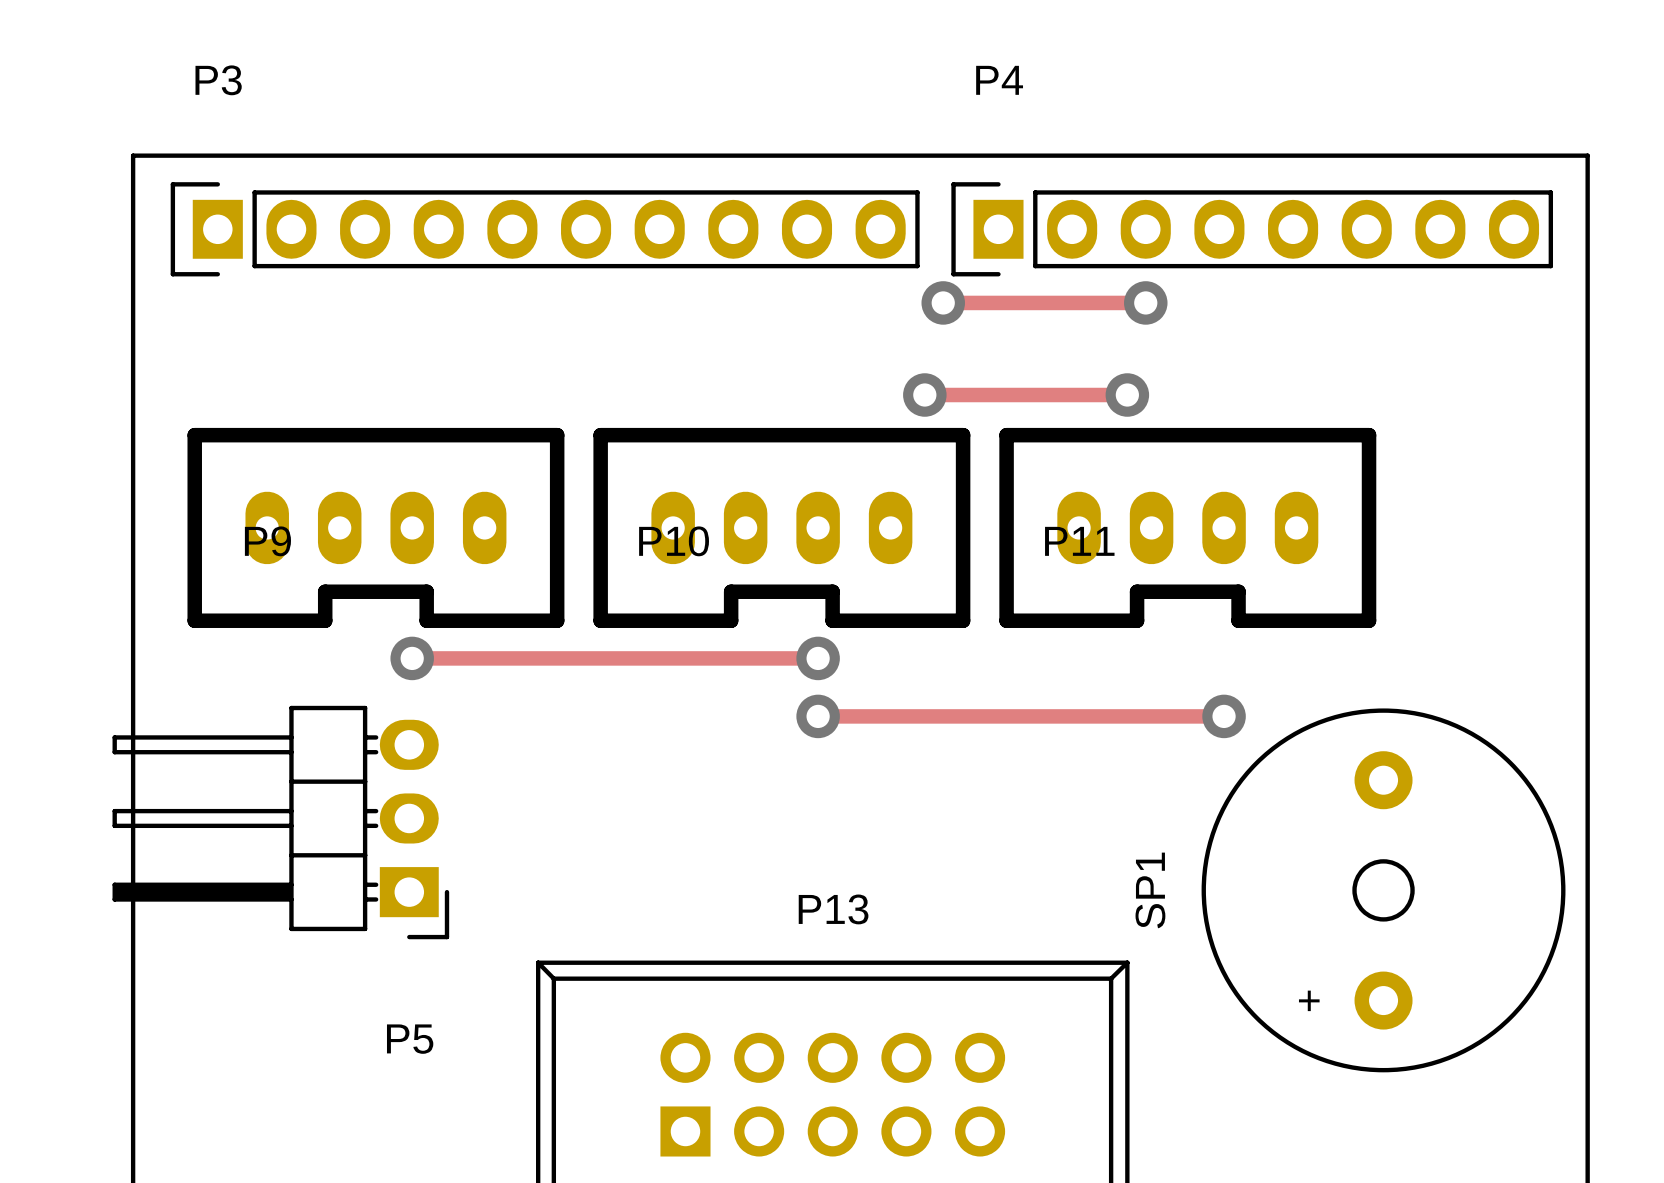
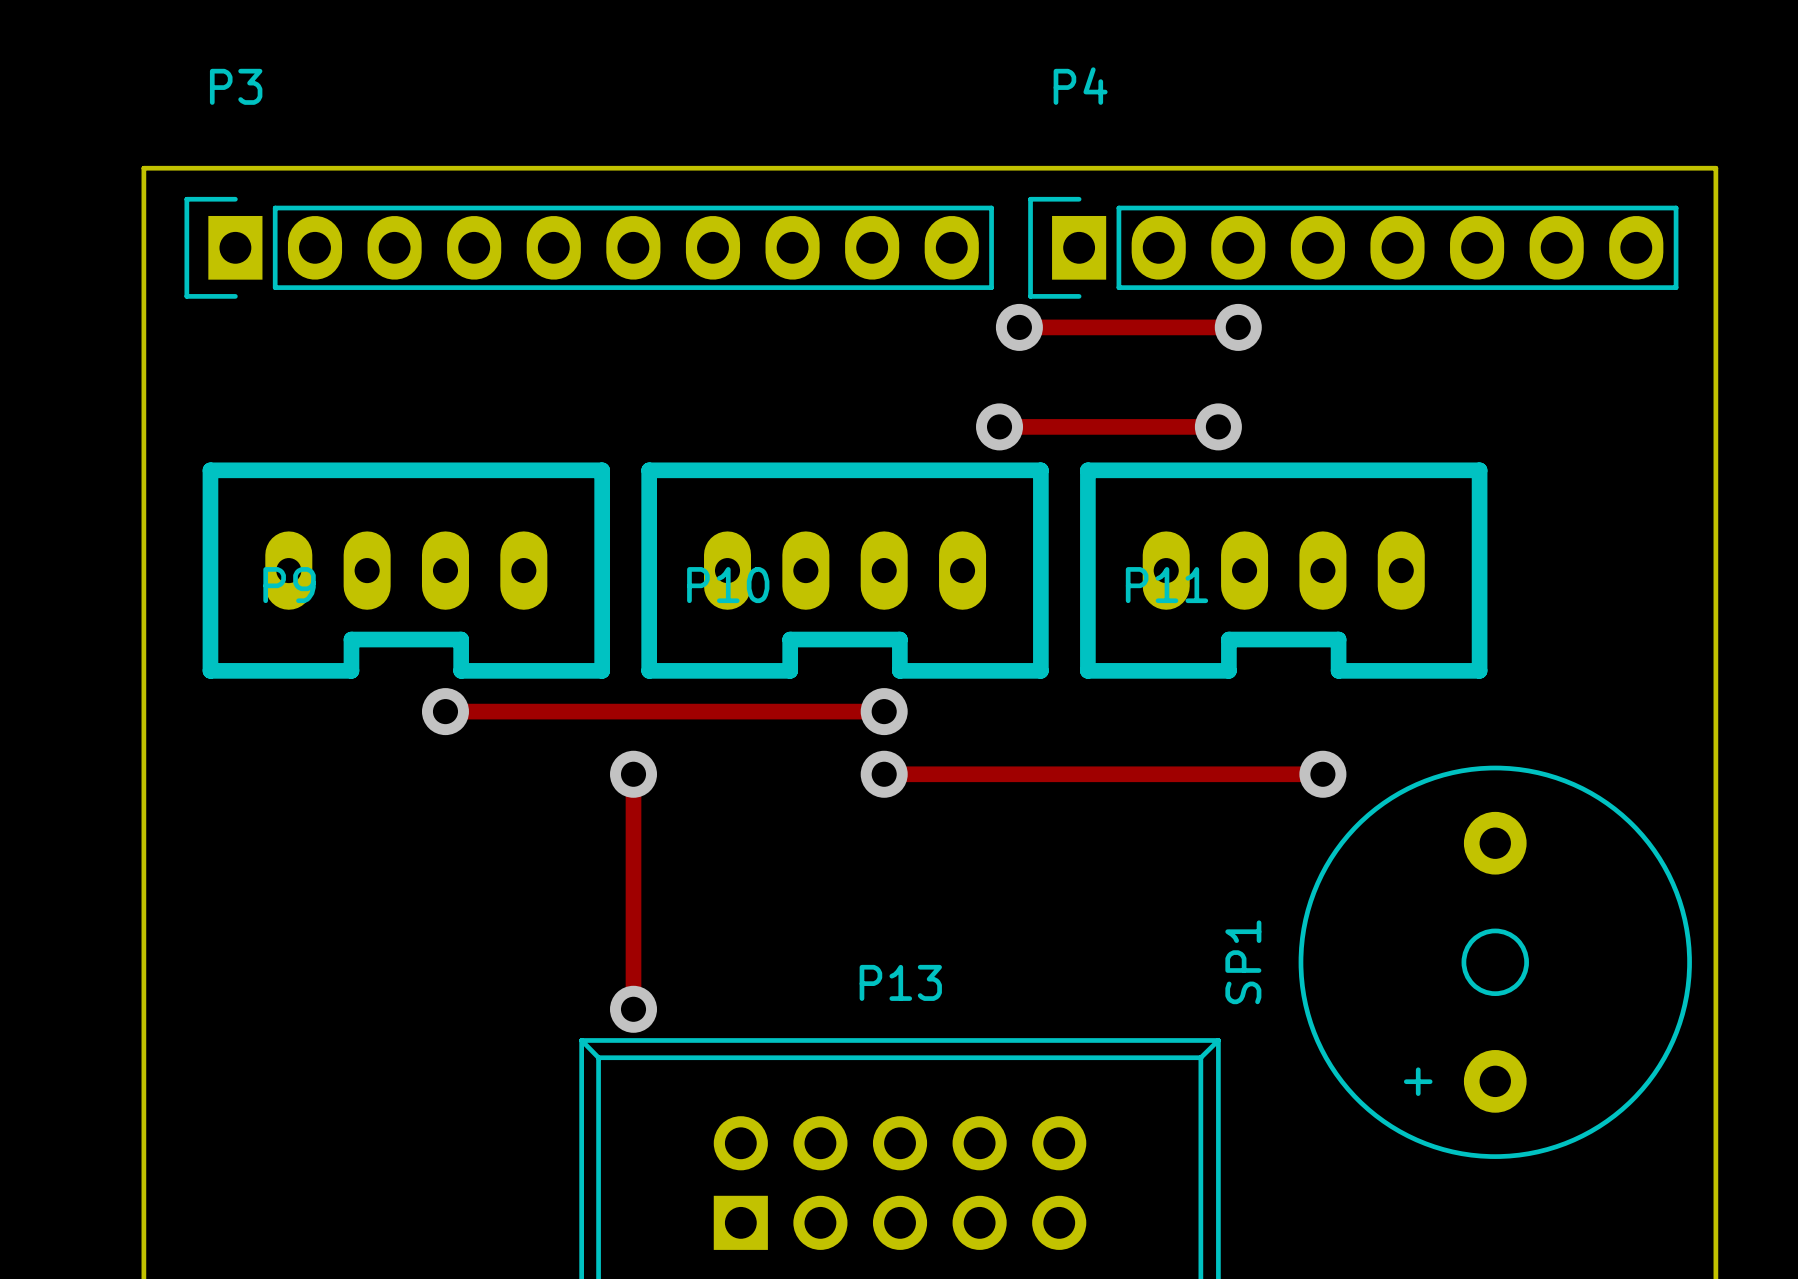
track: none -> (633, 774) (633, 1009)
via: none -> (633, 774)
P5: (280, 822) -> none
via: none -> (633, 1009)

